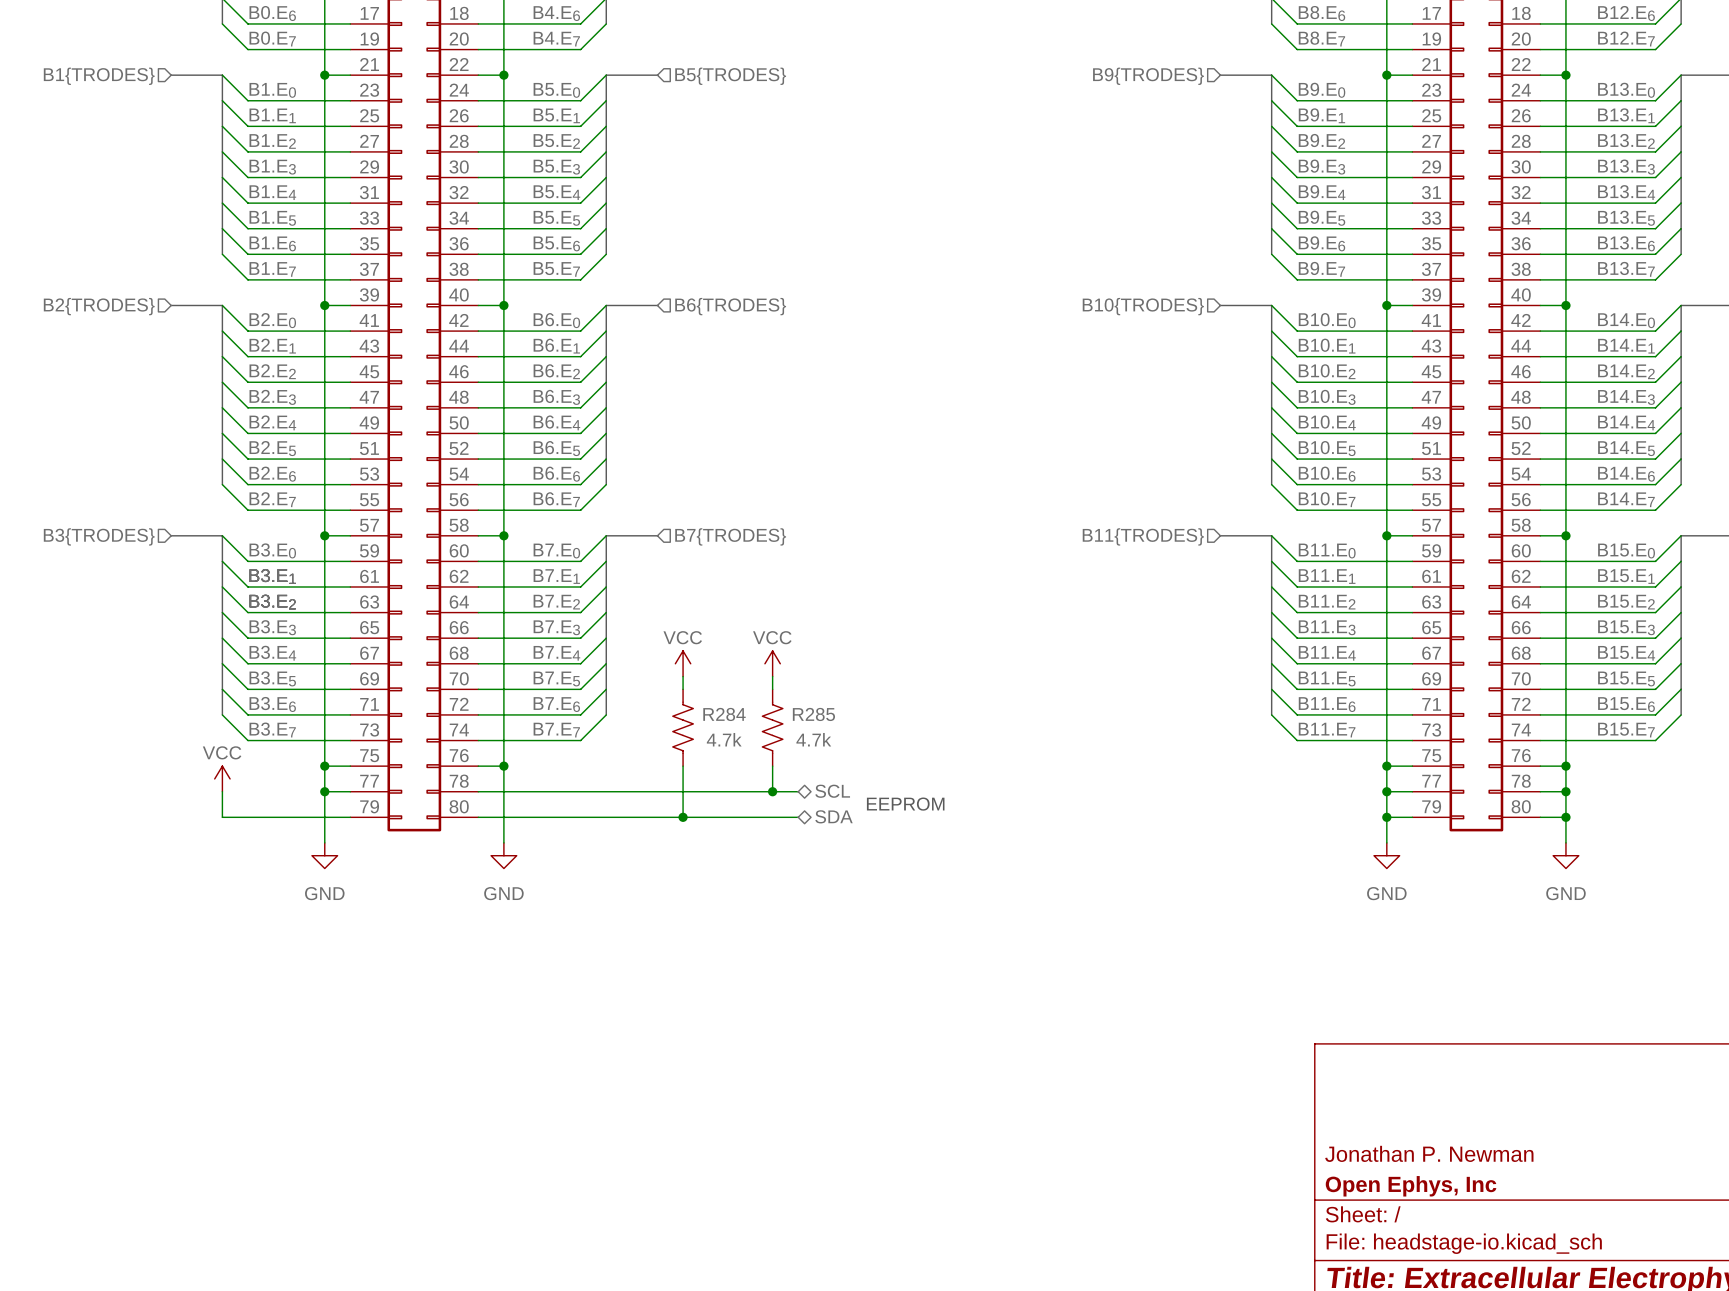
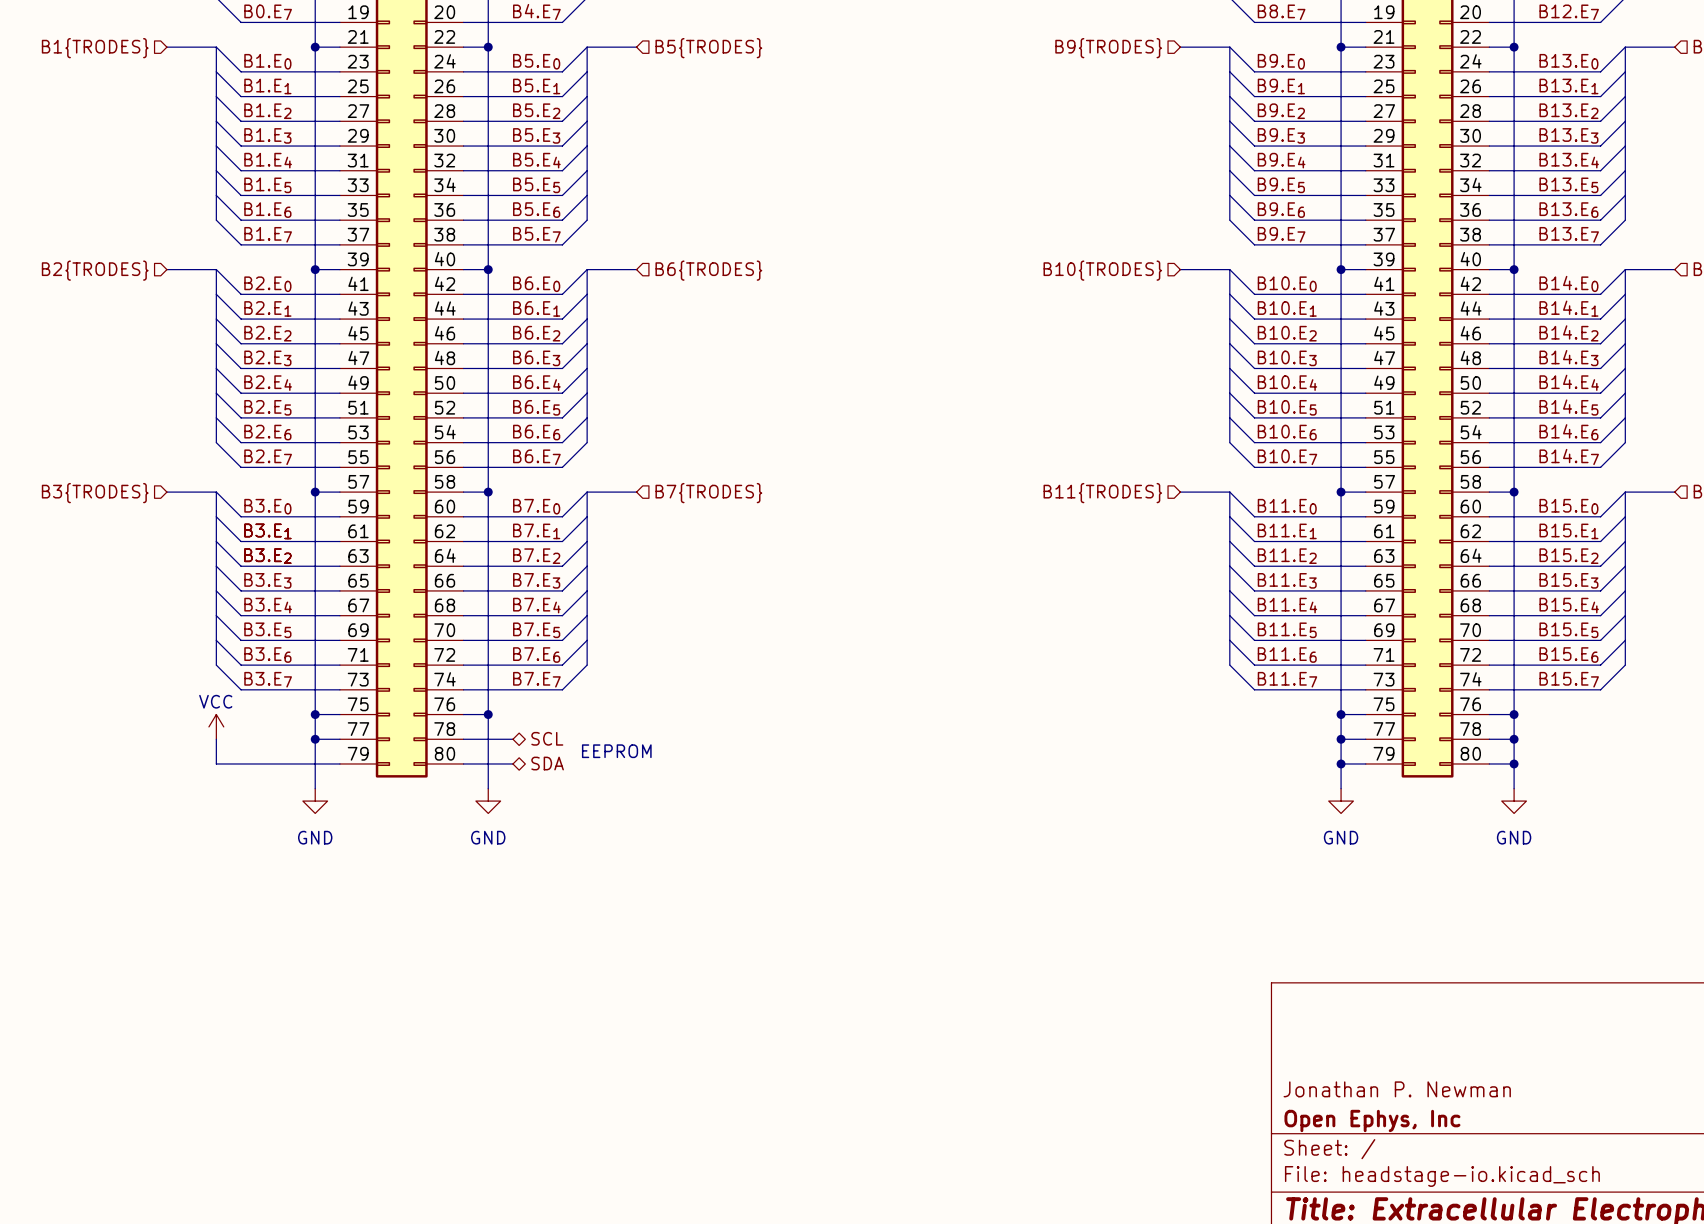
power symbol: VCC (683, 663) -> none
power symbol: VCC (772, 663) -> none
wire: (683, 676) (683, 689) -> none
wire: (772, 676) (772, 689) -> none
R284: 4.7k (683, 727) -> none
R285: 4.7k (772, 727) -> none
wire: (683, 766) (683, 817) -> none
wire: (772, 766) (772, 791) -> none
wire: (529, 791) (798, 791) -> none
hierarchical label: none -> SCL (547, 738)
junction: (772, 791) -> none
hierarchical label: SCL (832, 791) -> none
text: none -> EEPROM (616, 751)
text: EEPROM (905, 804) -> none
hierarchical label: none -> SDA (547, 763)
hierarchical label: SDA (833, 816) -> none
wire: (529, 817) (798, 817) -> none
junction: (683, 817) -> none

